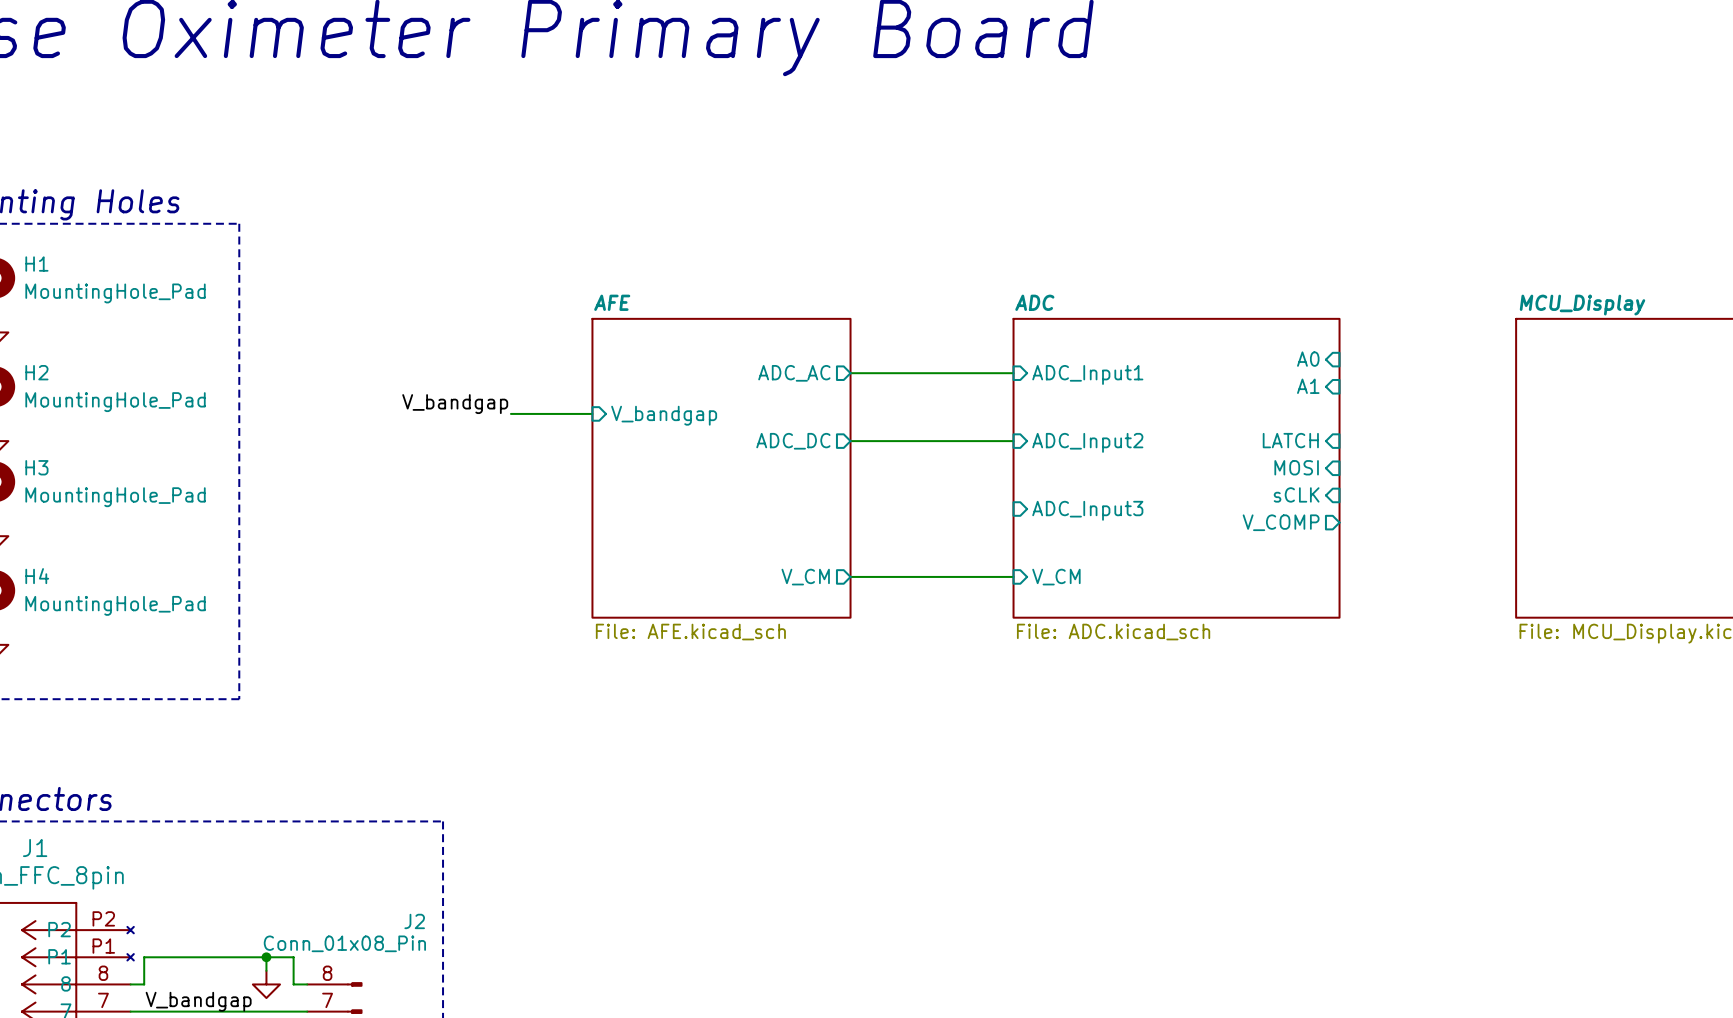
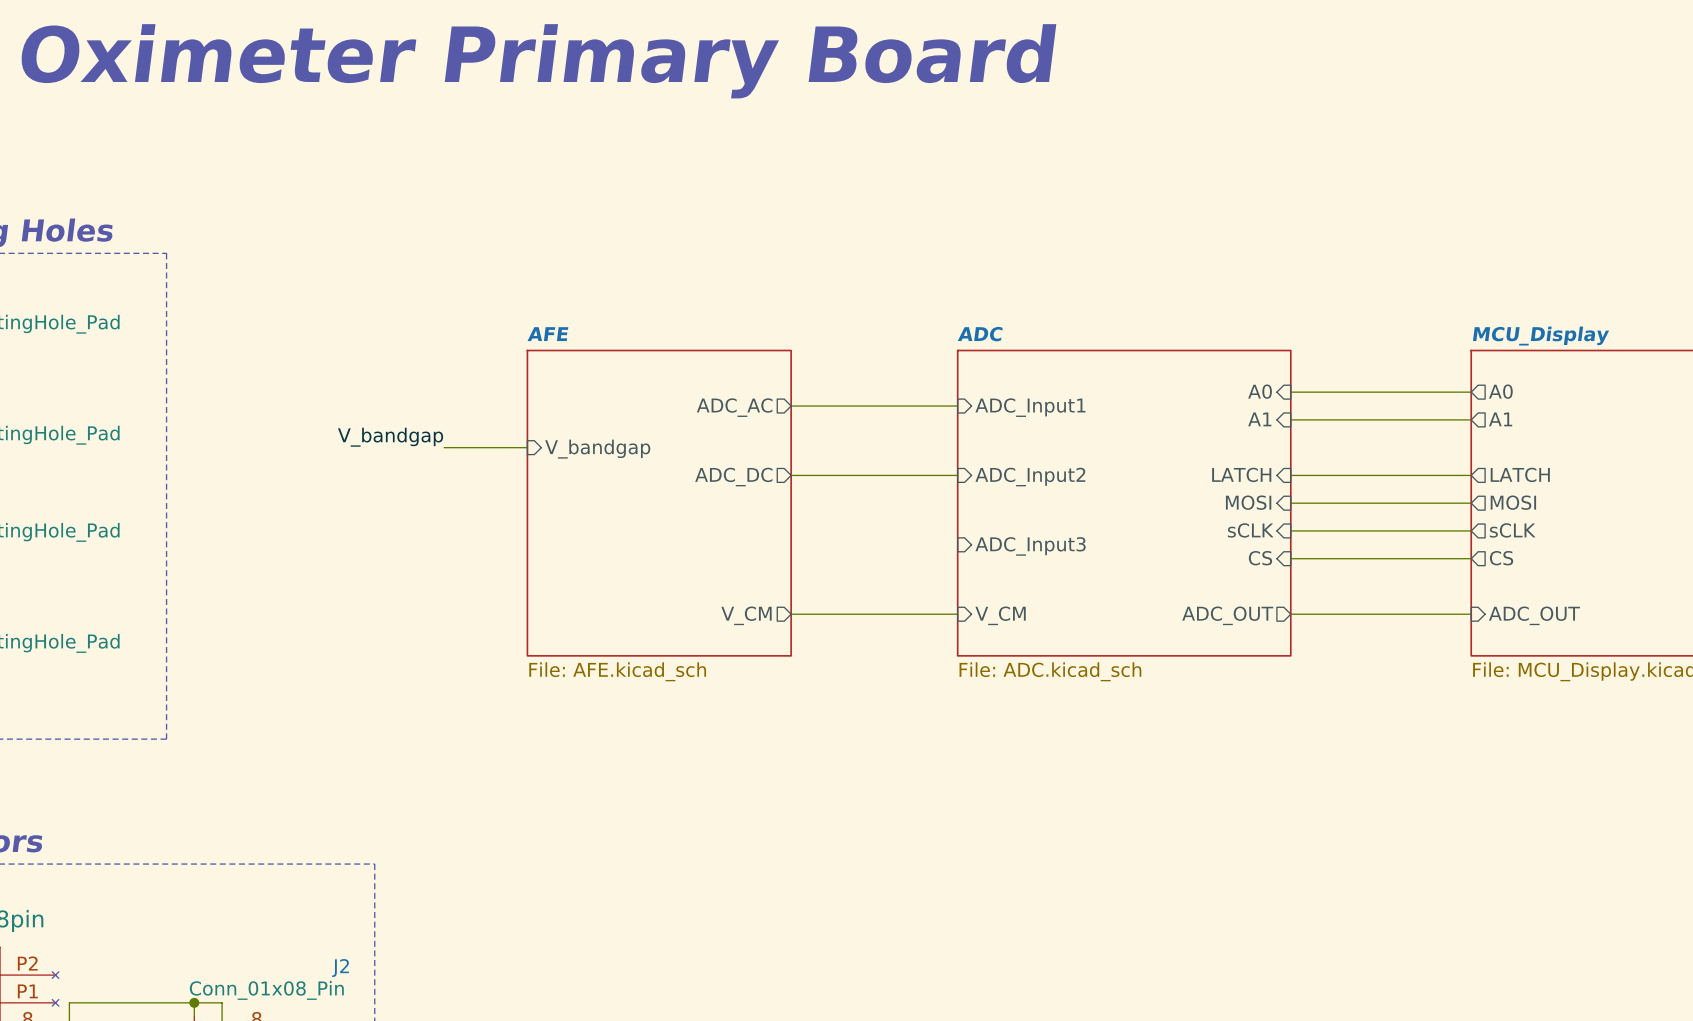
wire: none -> (1290, 392) (1471, 392)
sheet pin: none -> A0 (1500, 391)
wire: none -> (1290, 419) (1471, 419)
sheet pin: none -> A1 (1500, 419)
sheet pin: none -> LATCH (1520, 474)
wire: none -> (1290, 475) (1471, 475)
sheet pin: none -> MOSI (1513, 502)
wire: none -> (1290, 503) (1471, 503)
sheet pin: none -> sCLK (1512, 530)
wire: none -> (1290, 530) (1471, 530)
sheet pin shape: output (1281, 522) -> input (1260, 558)
sheet pin: V_COMP (1281, 522) -> CS (1260, 558)
wire: none -> (1290, 558) (1471, 558)
sheet pin: none -> CS (1501, 558)
wire: none -> (1290, 614) (1471, 614)
sheet pin: none -> ADC_OUT (1227, 615)
sheet pin: none -> ADC_OUT (1534, 615)

